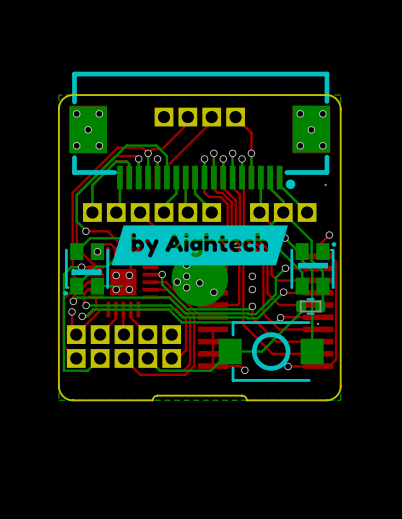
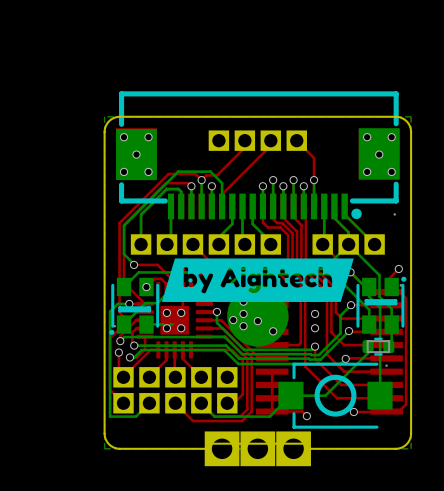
part: none -> (222, 448)
part: none -> (257, 448)
part: none -> (293, 448)

